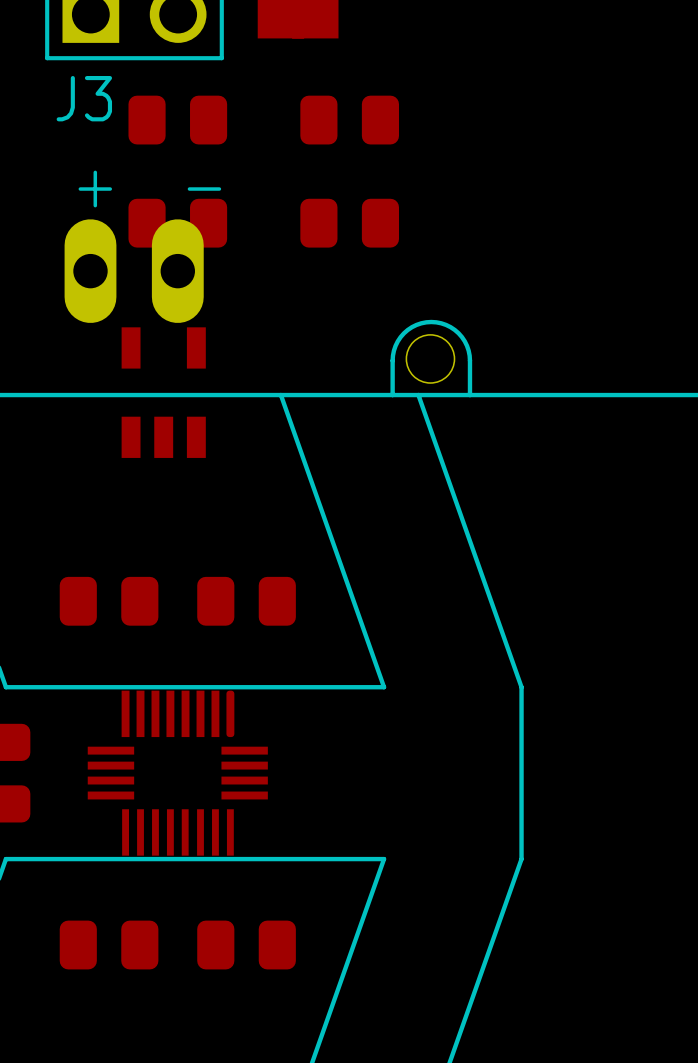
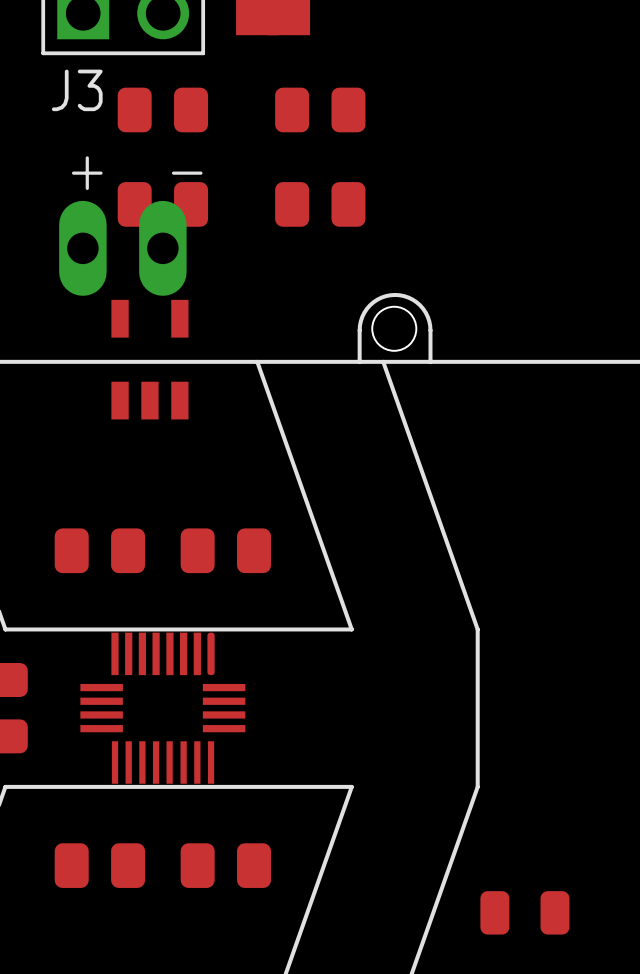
part: none -> (524, 912)

